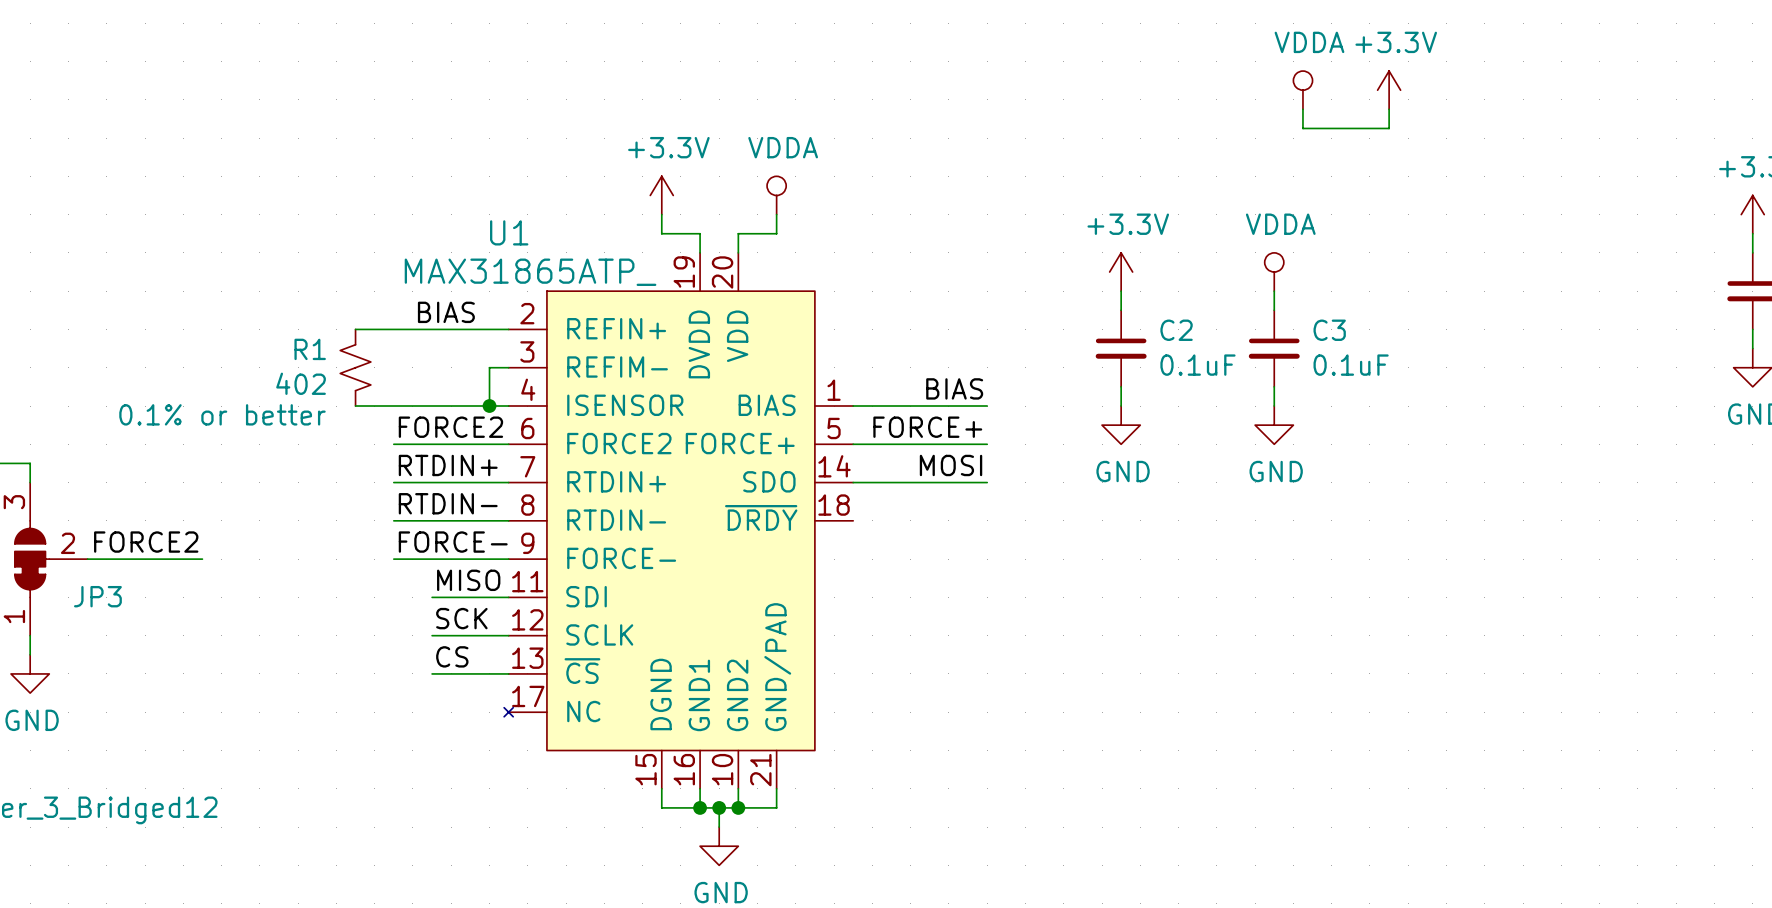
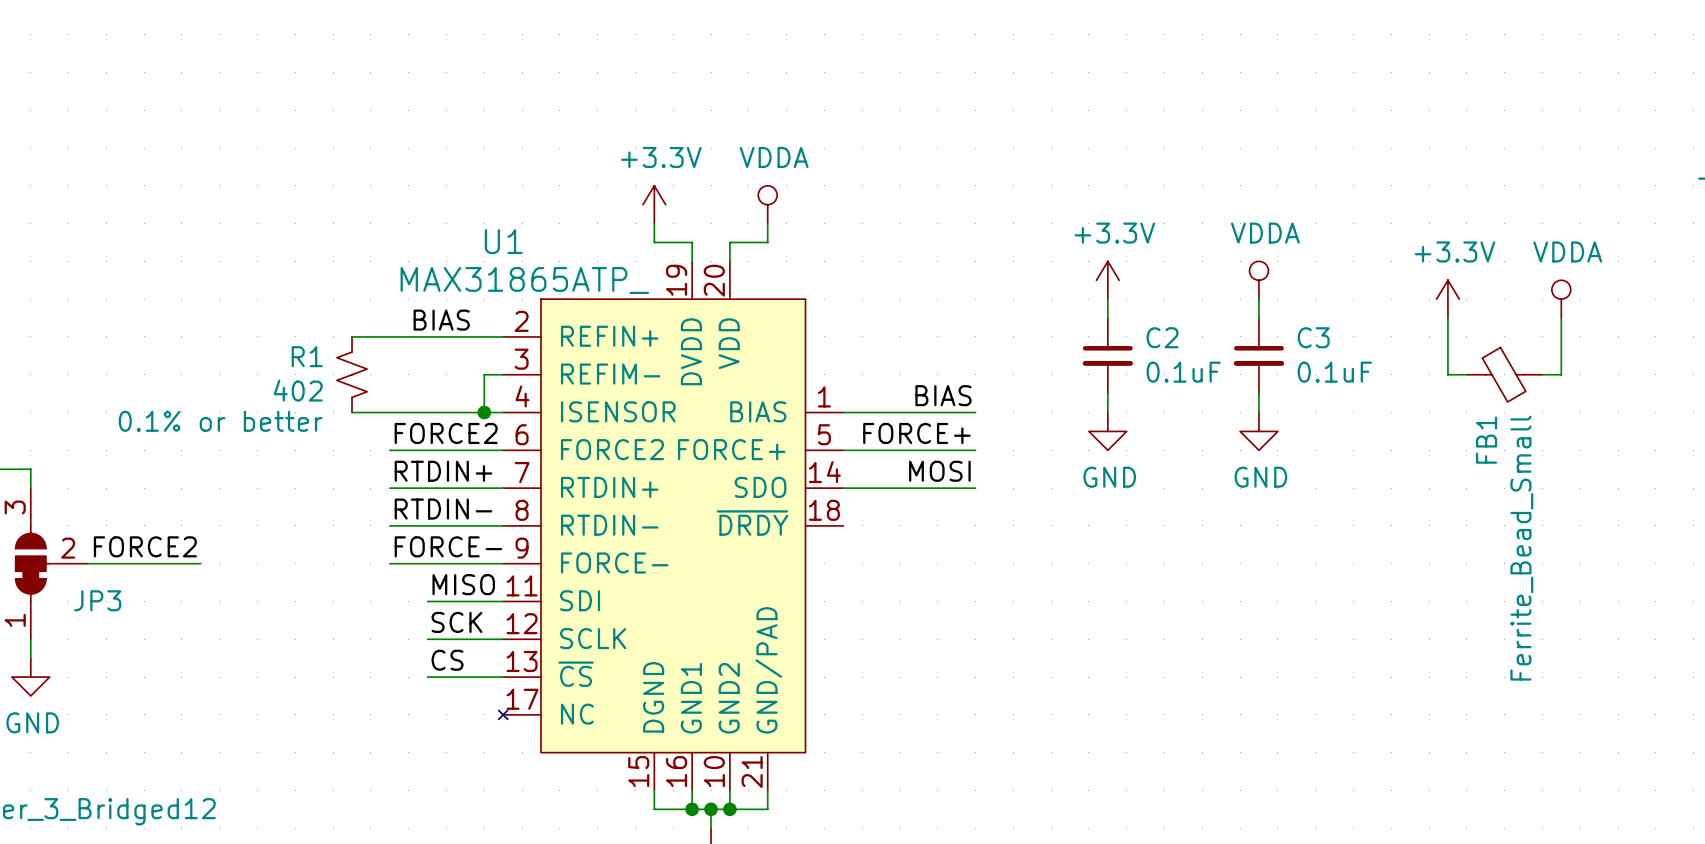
power symbol position: VDDA (1302, 90) -> VDDA (1561, 299)
power symbol position: +3.3V (1389, 90) -> +3.3V (1447, 299)
wire: (1302, 109) (1302, 128) (1389, 128) (1389, 109) -> none
wire: none -> (1447, 318) (1447, 374) (1466, 374)
wire: none -> (1561, 318) (1561, 374) (1542, 374)
FB1: none -> Ferrite_Bead_Small (1504, 374)

